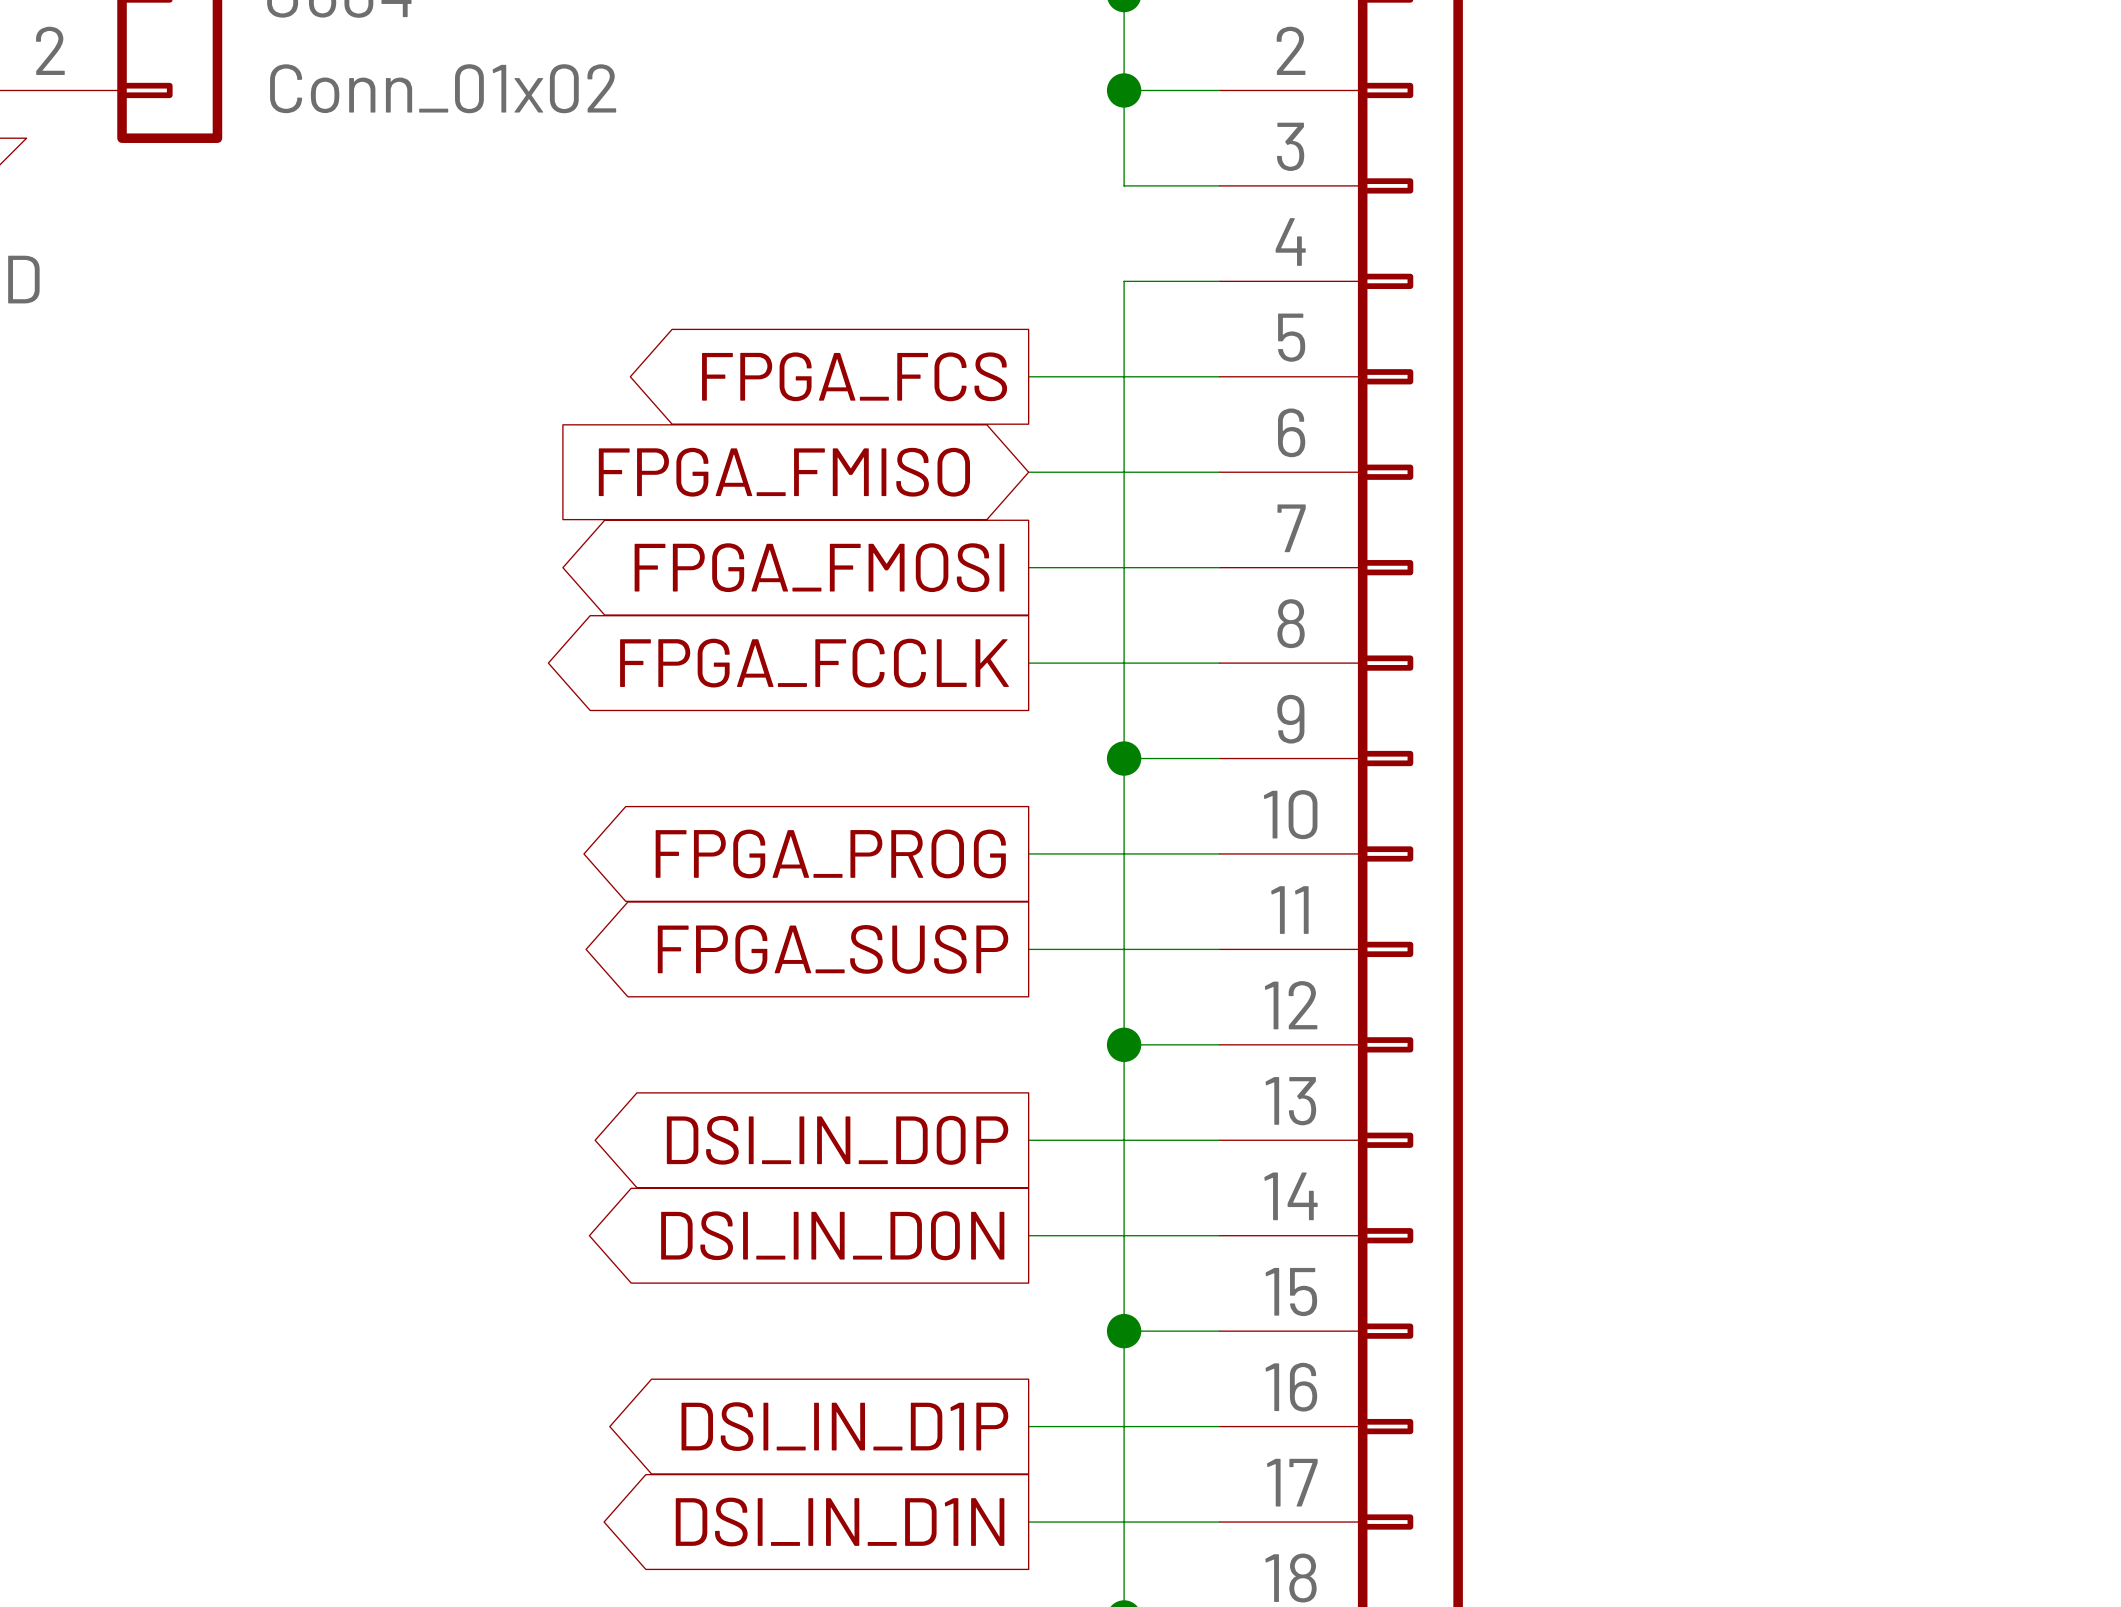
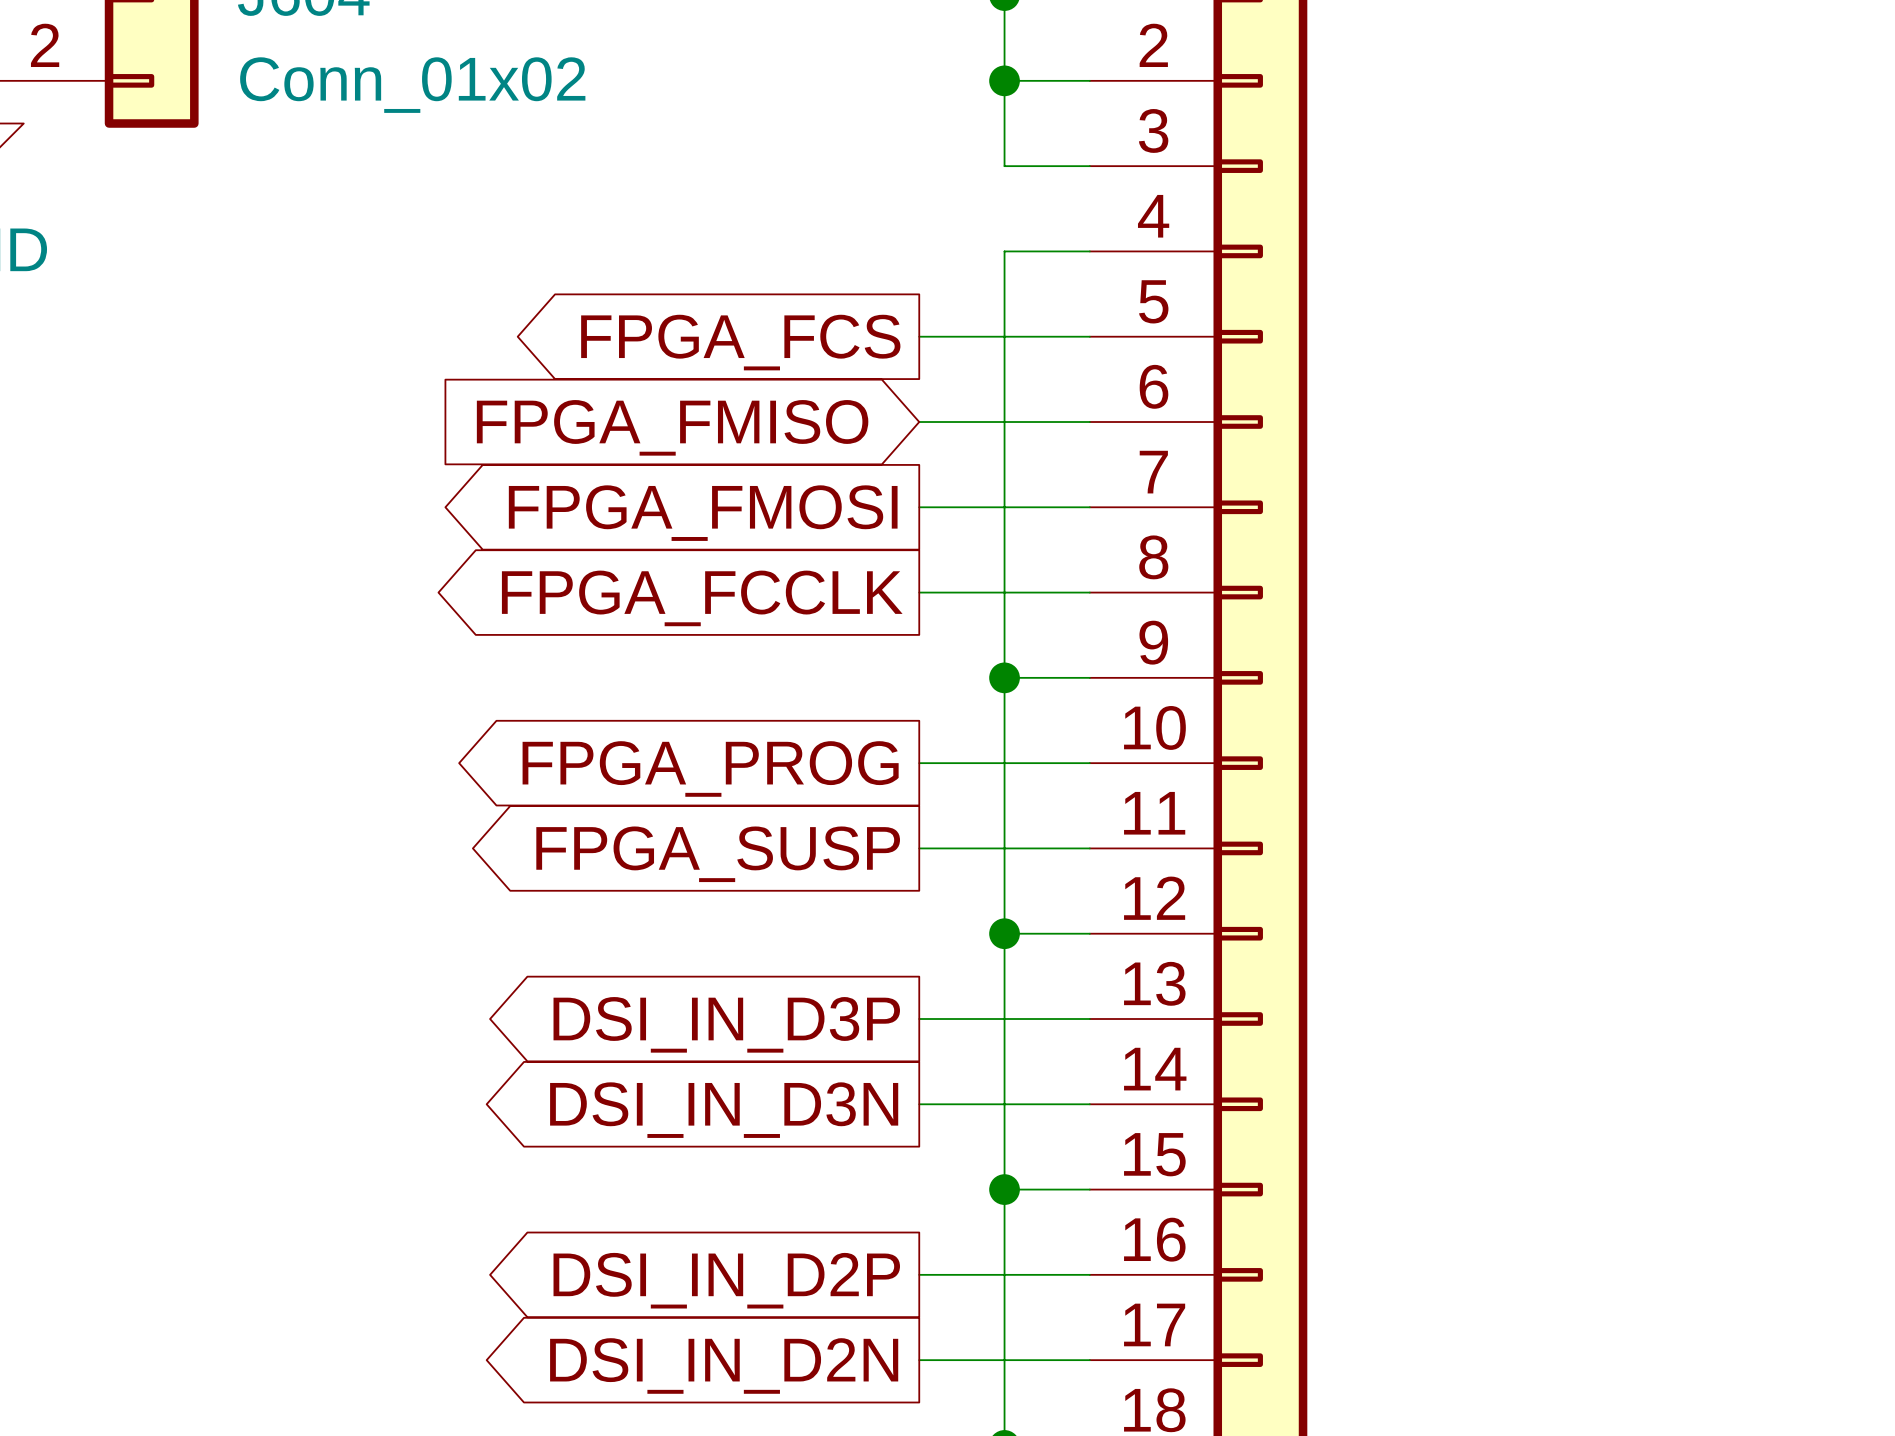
global label: DSI_IN_D0P (837, 1140) -> DSI_IN_D3P (726, 1024)
global label: DSI_IN_D0N (832, 1235) -> DSI_IN_D3N (724, 1110)
global label: DSI_IN_D1P (844, 1426) -> DSI_IN_D2P (726, 1280)
global label: DSI_IN_D1N (840, 1522) -> DSI_IN_D2N (724, 1365)

